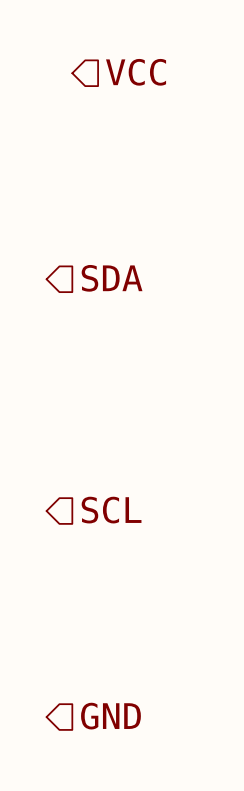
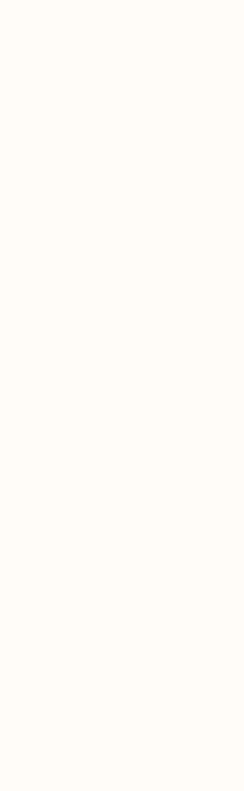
hierarchical label: VCC (136, 72) -> none
hierarchical label: SDA (112, 278) -> none
hierarchical label: SCL (111, 510) -> none
hierarchical label: GND (110, 716) -> none

